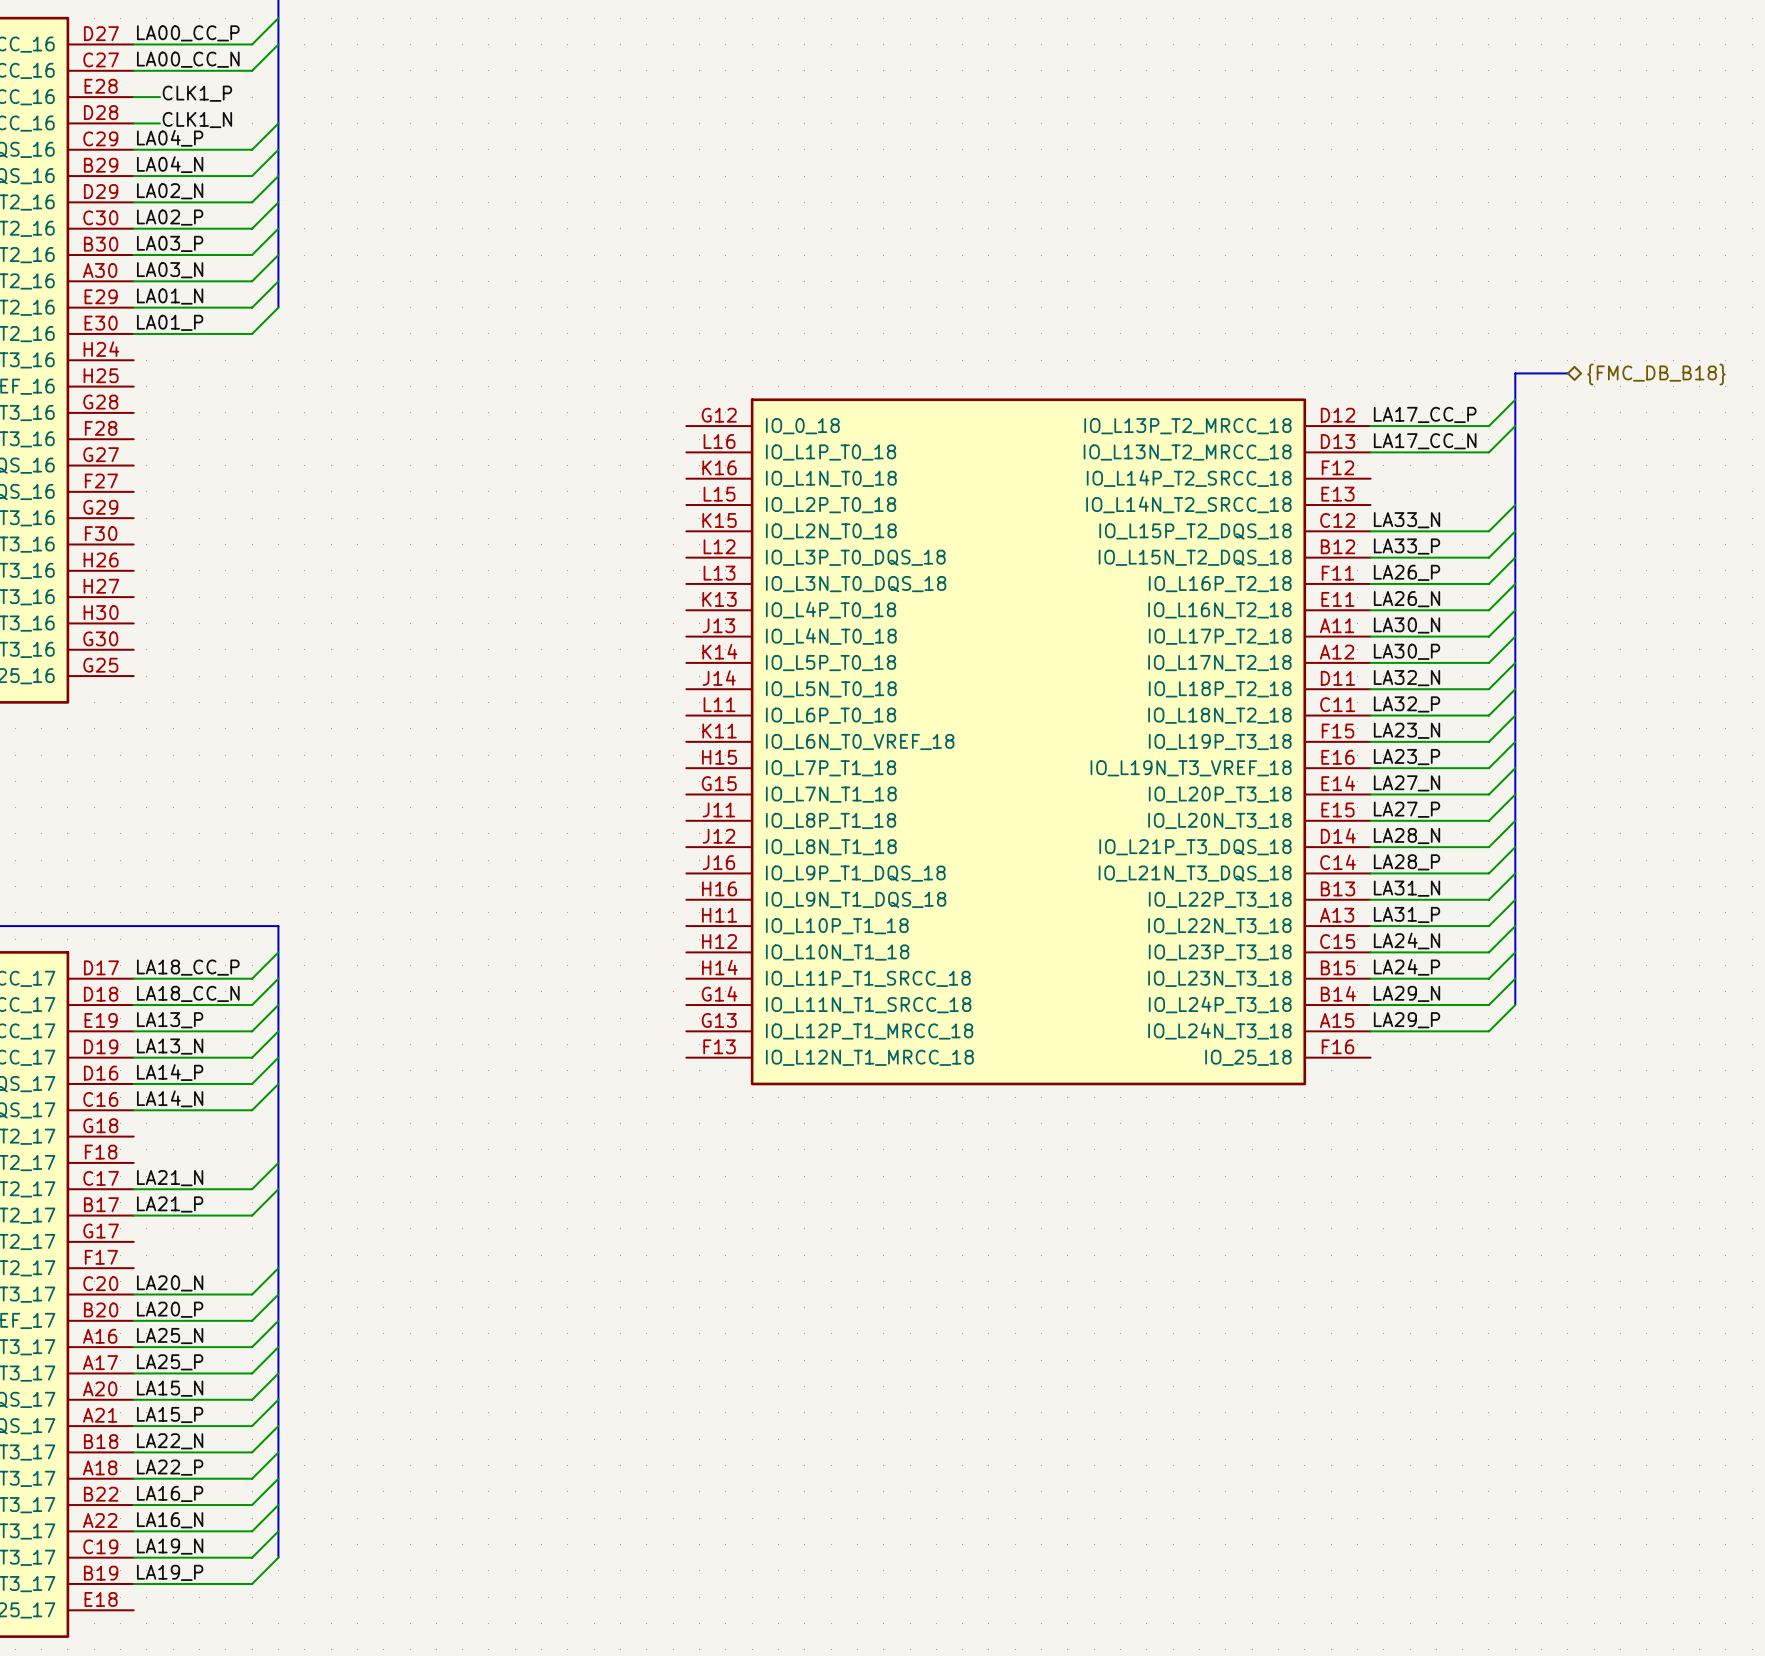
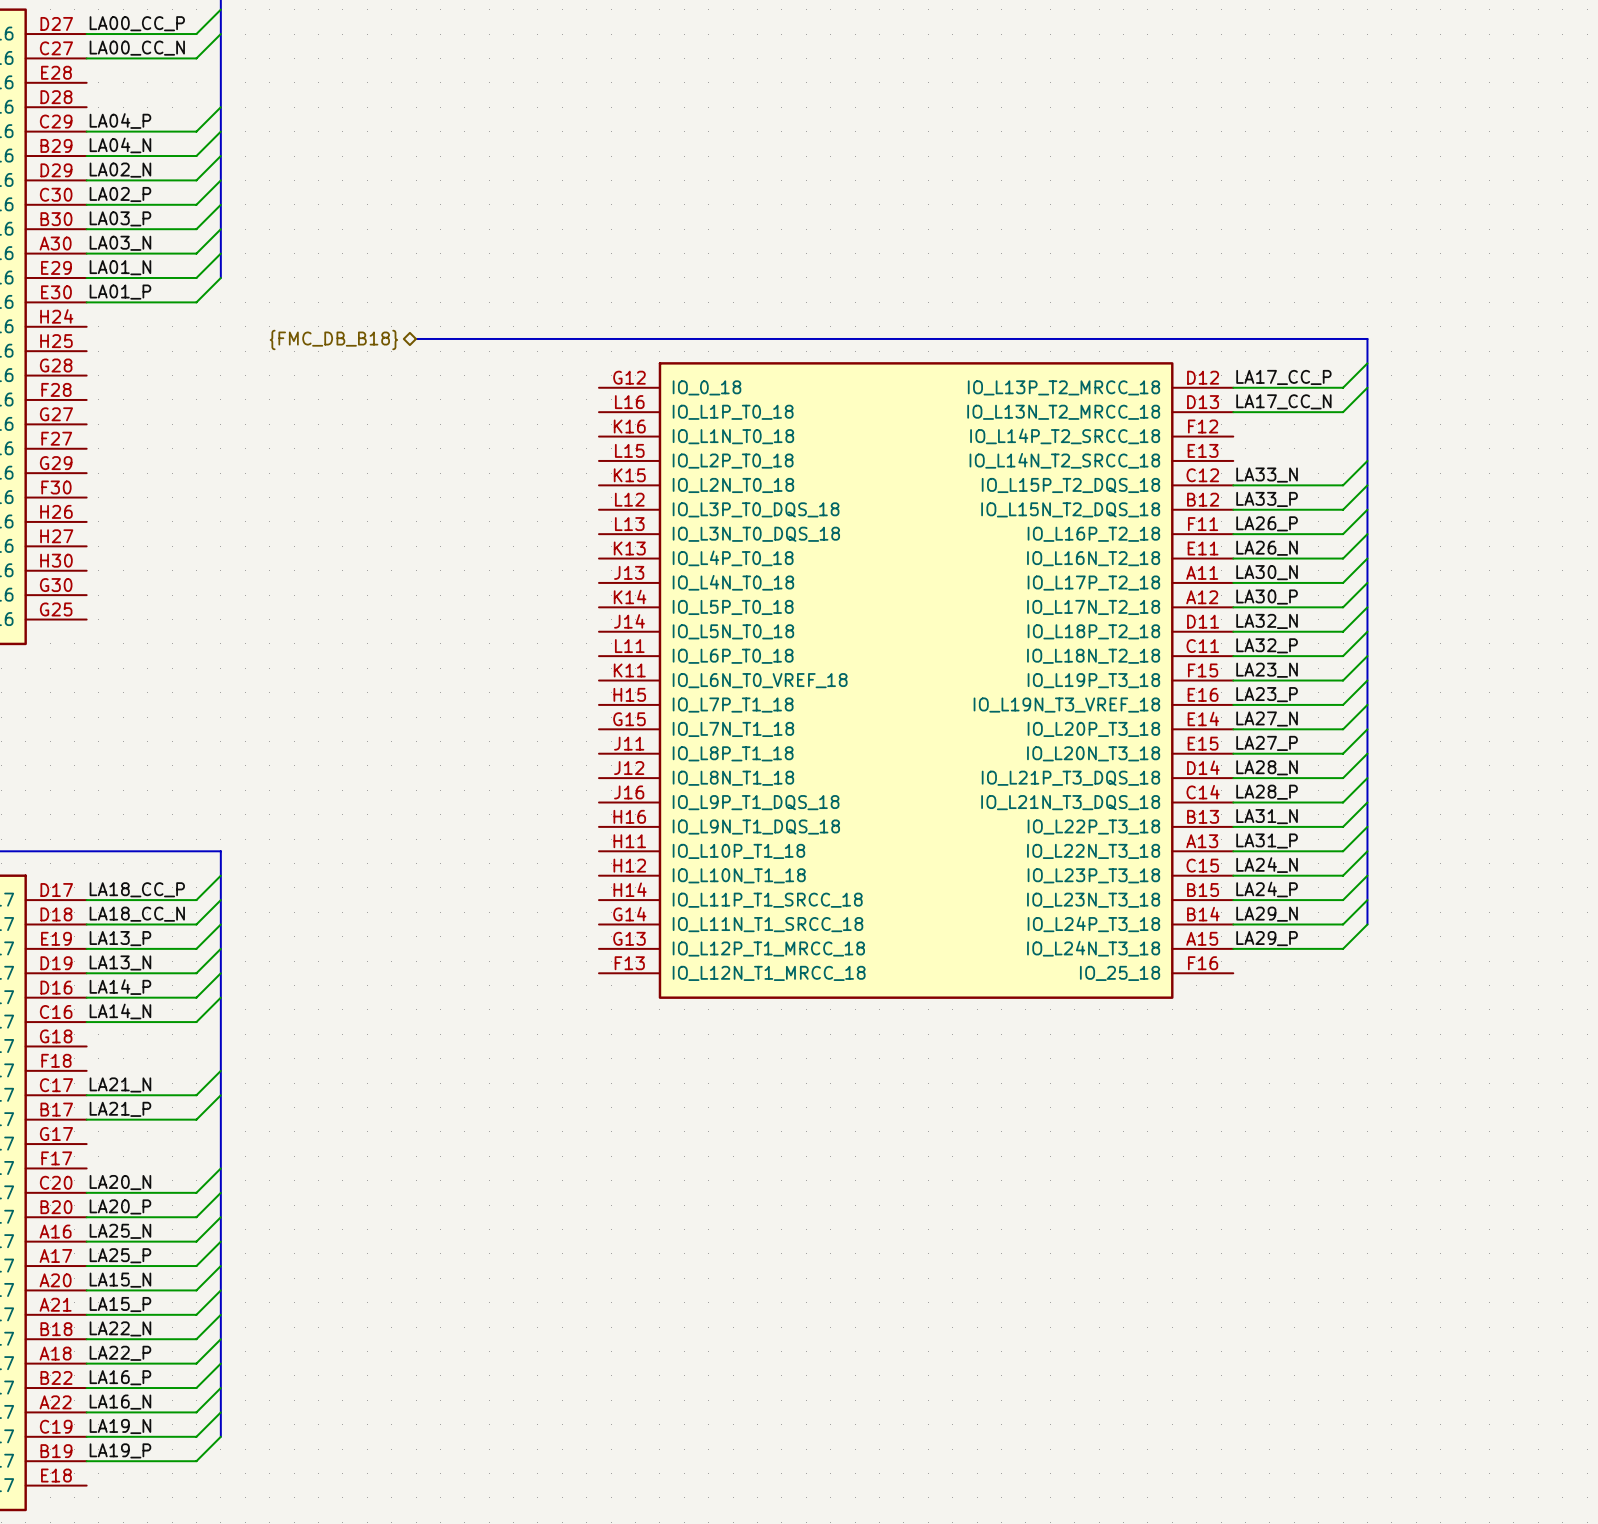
label: CLK1_P (197, 93) -> none
wire: (133, 97) (160, 97) -> none
label: CLK1_N (197, 120) -> none
wire: (133, 123) (160, 123) -> none
bus: (1515, 373) (1567, 373) -> (1367, 338) (416, 338)
hierarchical label: none -> {FMC_DB_B18} (333, 339)
hierarchical label: {FMC_DB_B18} (1656, 374) -> none

